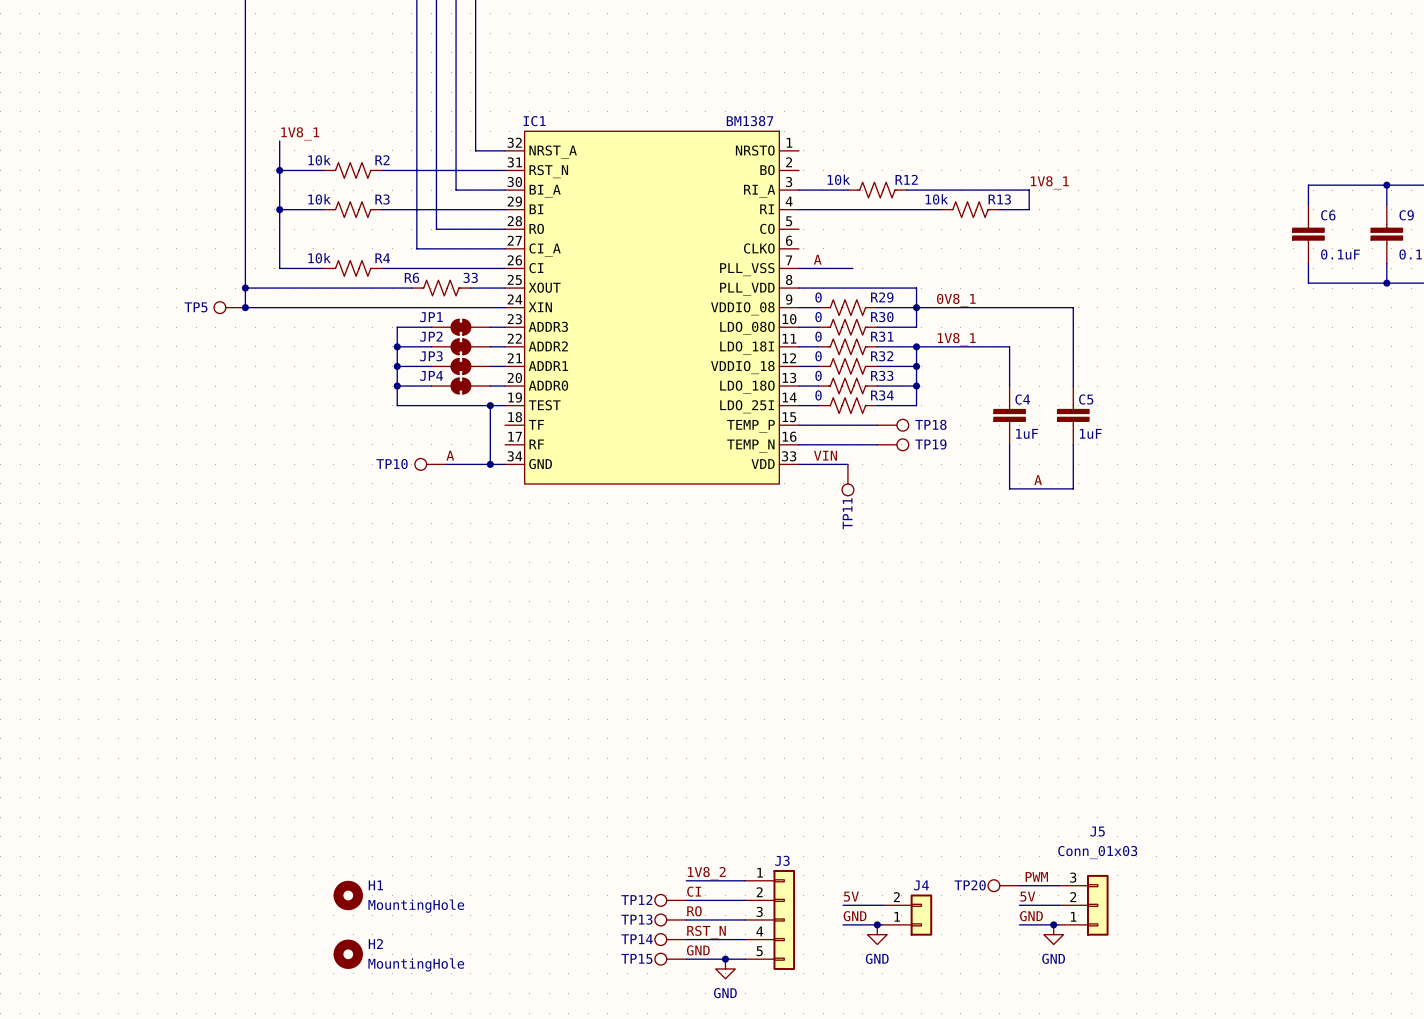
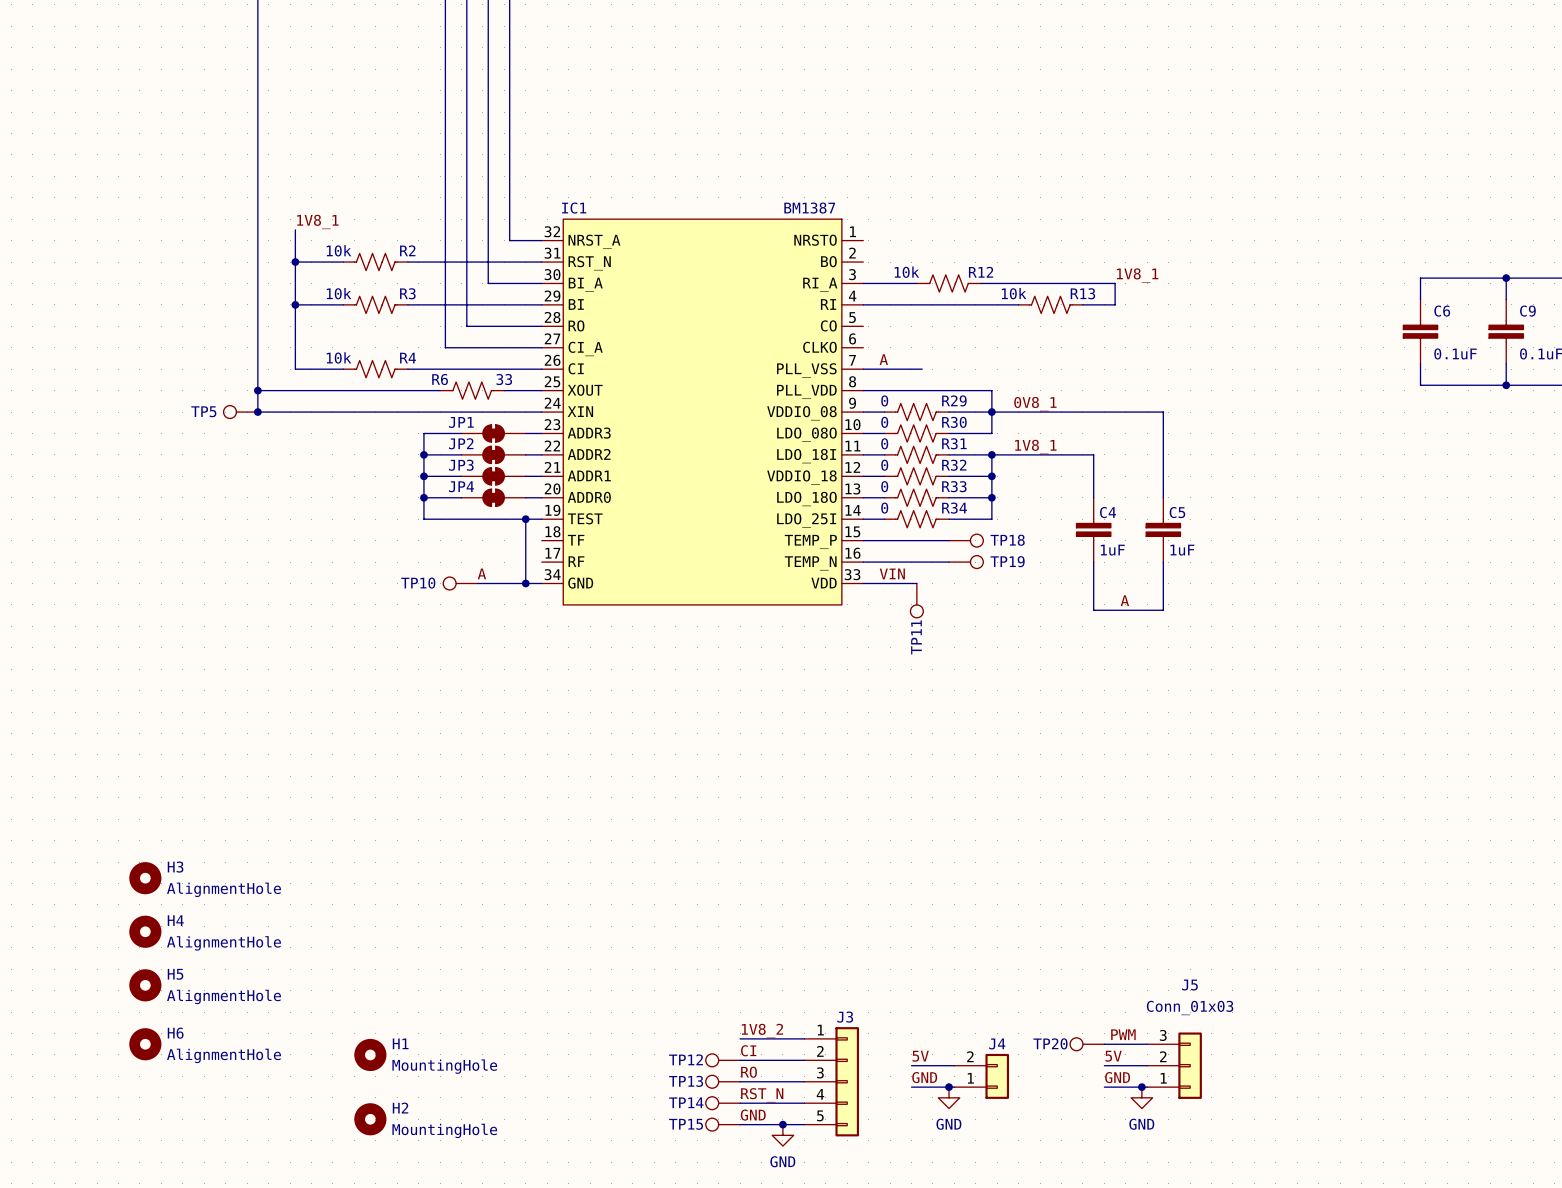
H3: none -> AlignmentHole (145, 878)
H4: none -> AlignmentHole (145, 931)
H5: none -> AlignmentHole (145, 985)
H6: none -> AlignmentHole (145, 1044)

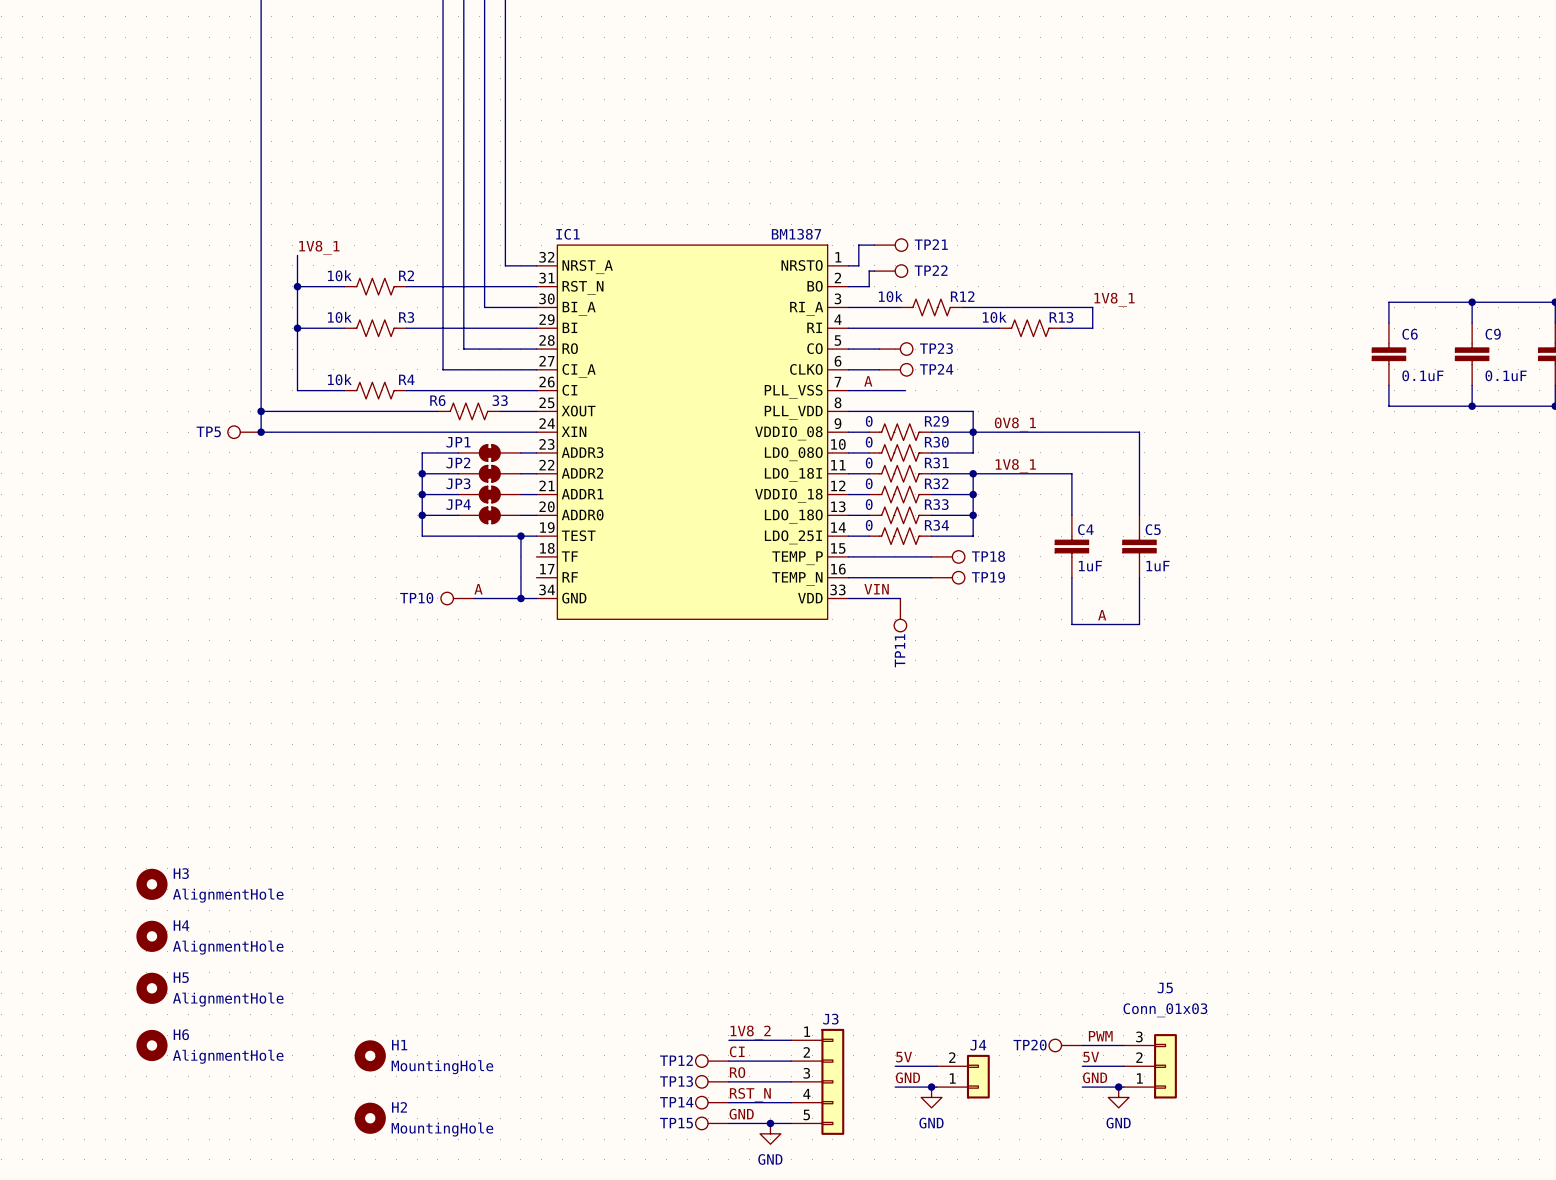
wire: none -> (874, 245) (858, 245) (858, 265) (848, 265)
TP21: none -> (891, 245)
wire: none -> (874, 271) (869, 271) (869, 286) (848, 286)
TP22: none -> (891, 271)
wire: none -> (848, 349) (879, 349)
TP23: none -> (896, 349)
wire: none -> (848, 369) (879, 369)
TP24: none -> (896, 369)

